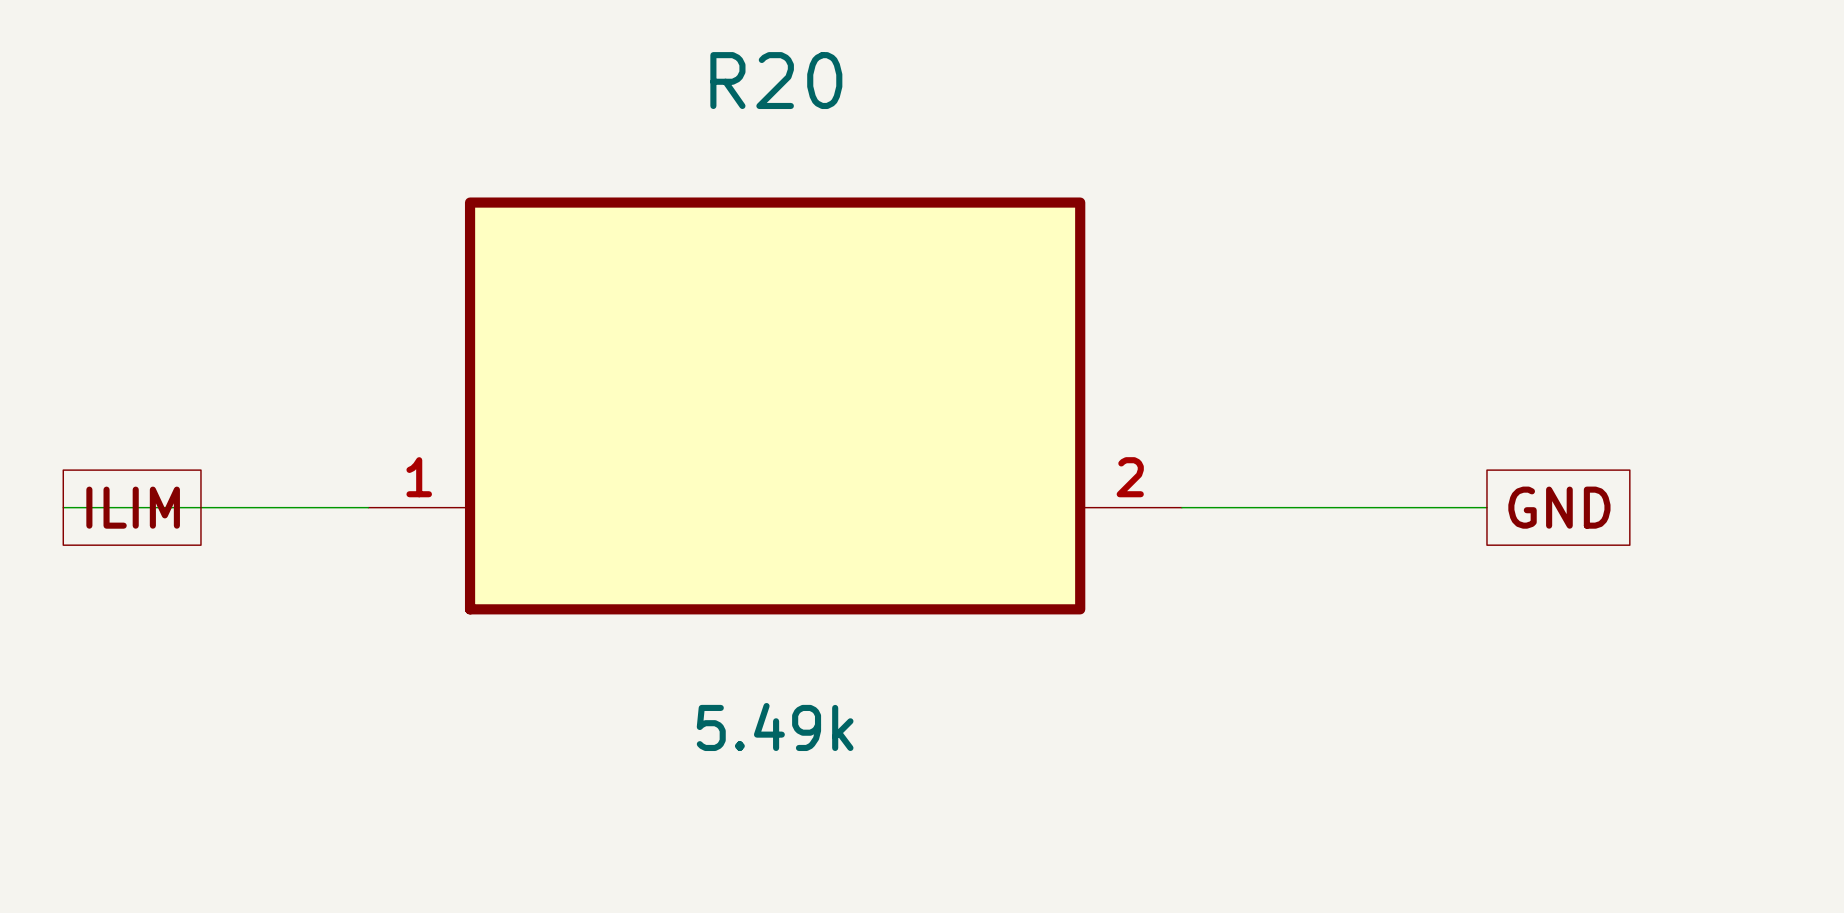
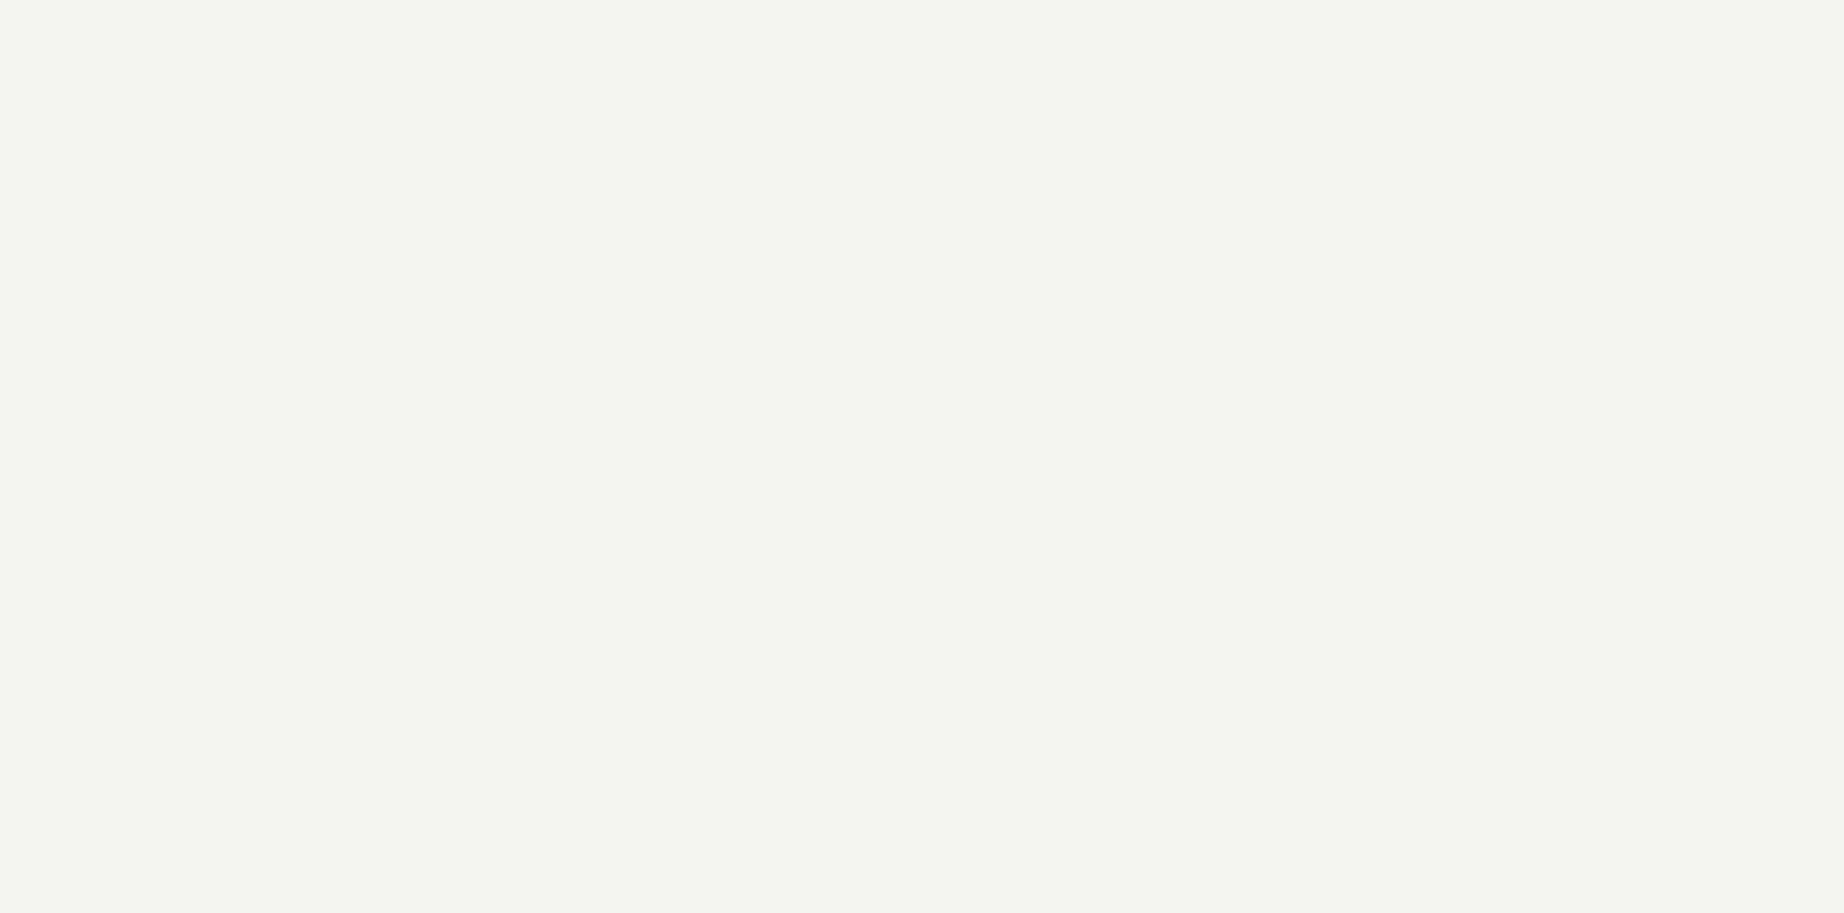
R20: 5.49k (775, 405) -> none
wire: (63, 507) (368, 507) -> none
global label: ILIM (133, 507) -> none
wire: (1181, 507) (1486, 507) -> none
global label: GND (1559, 507) -> none

